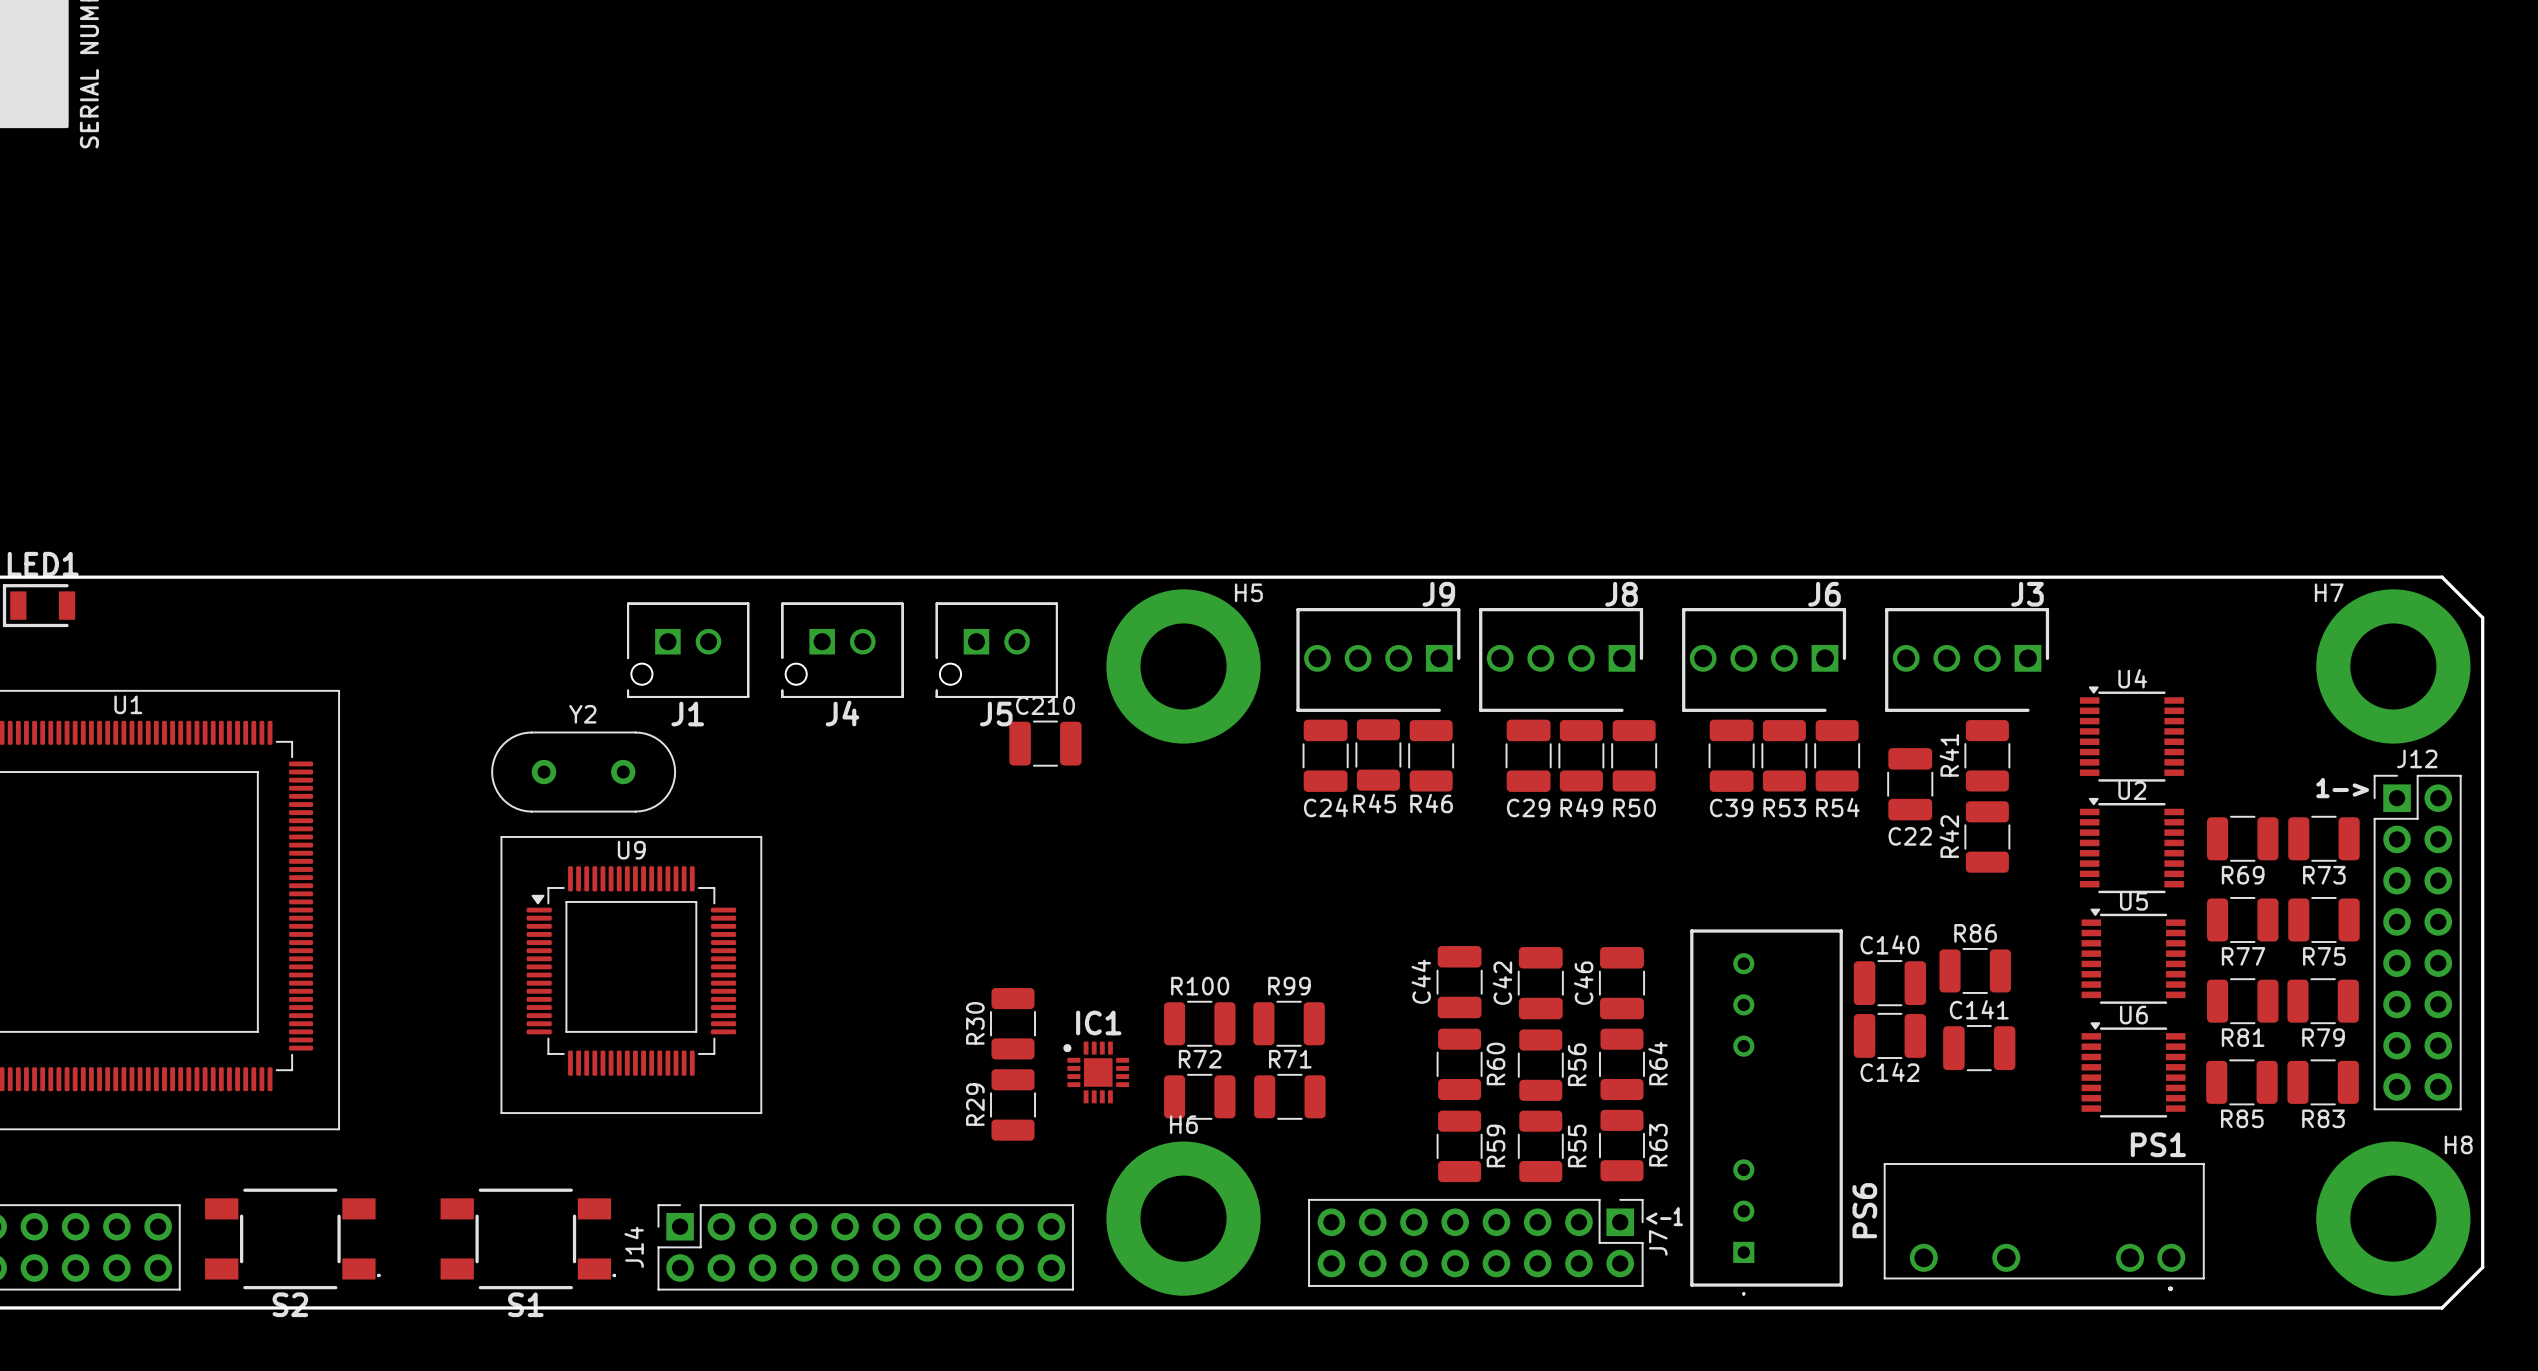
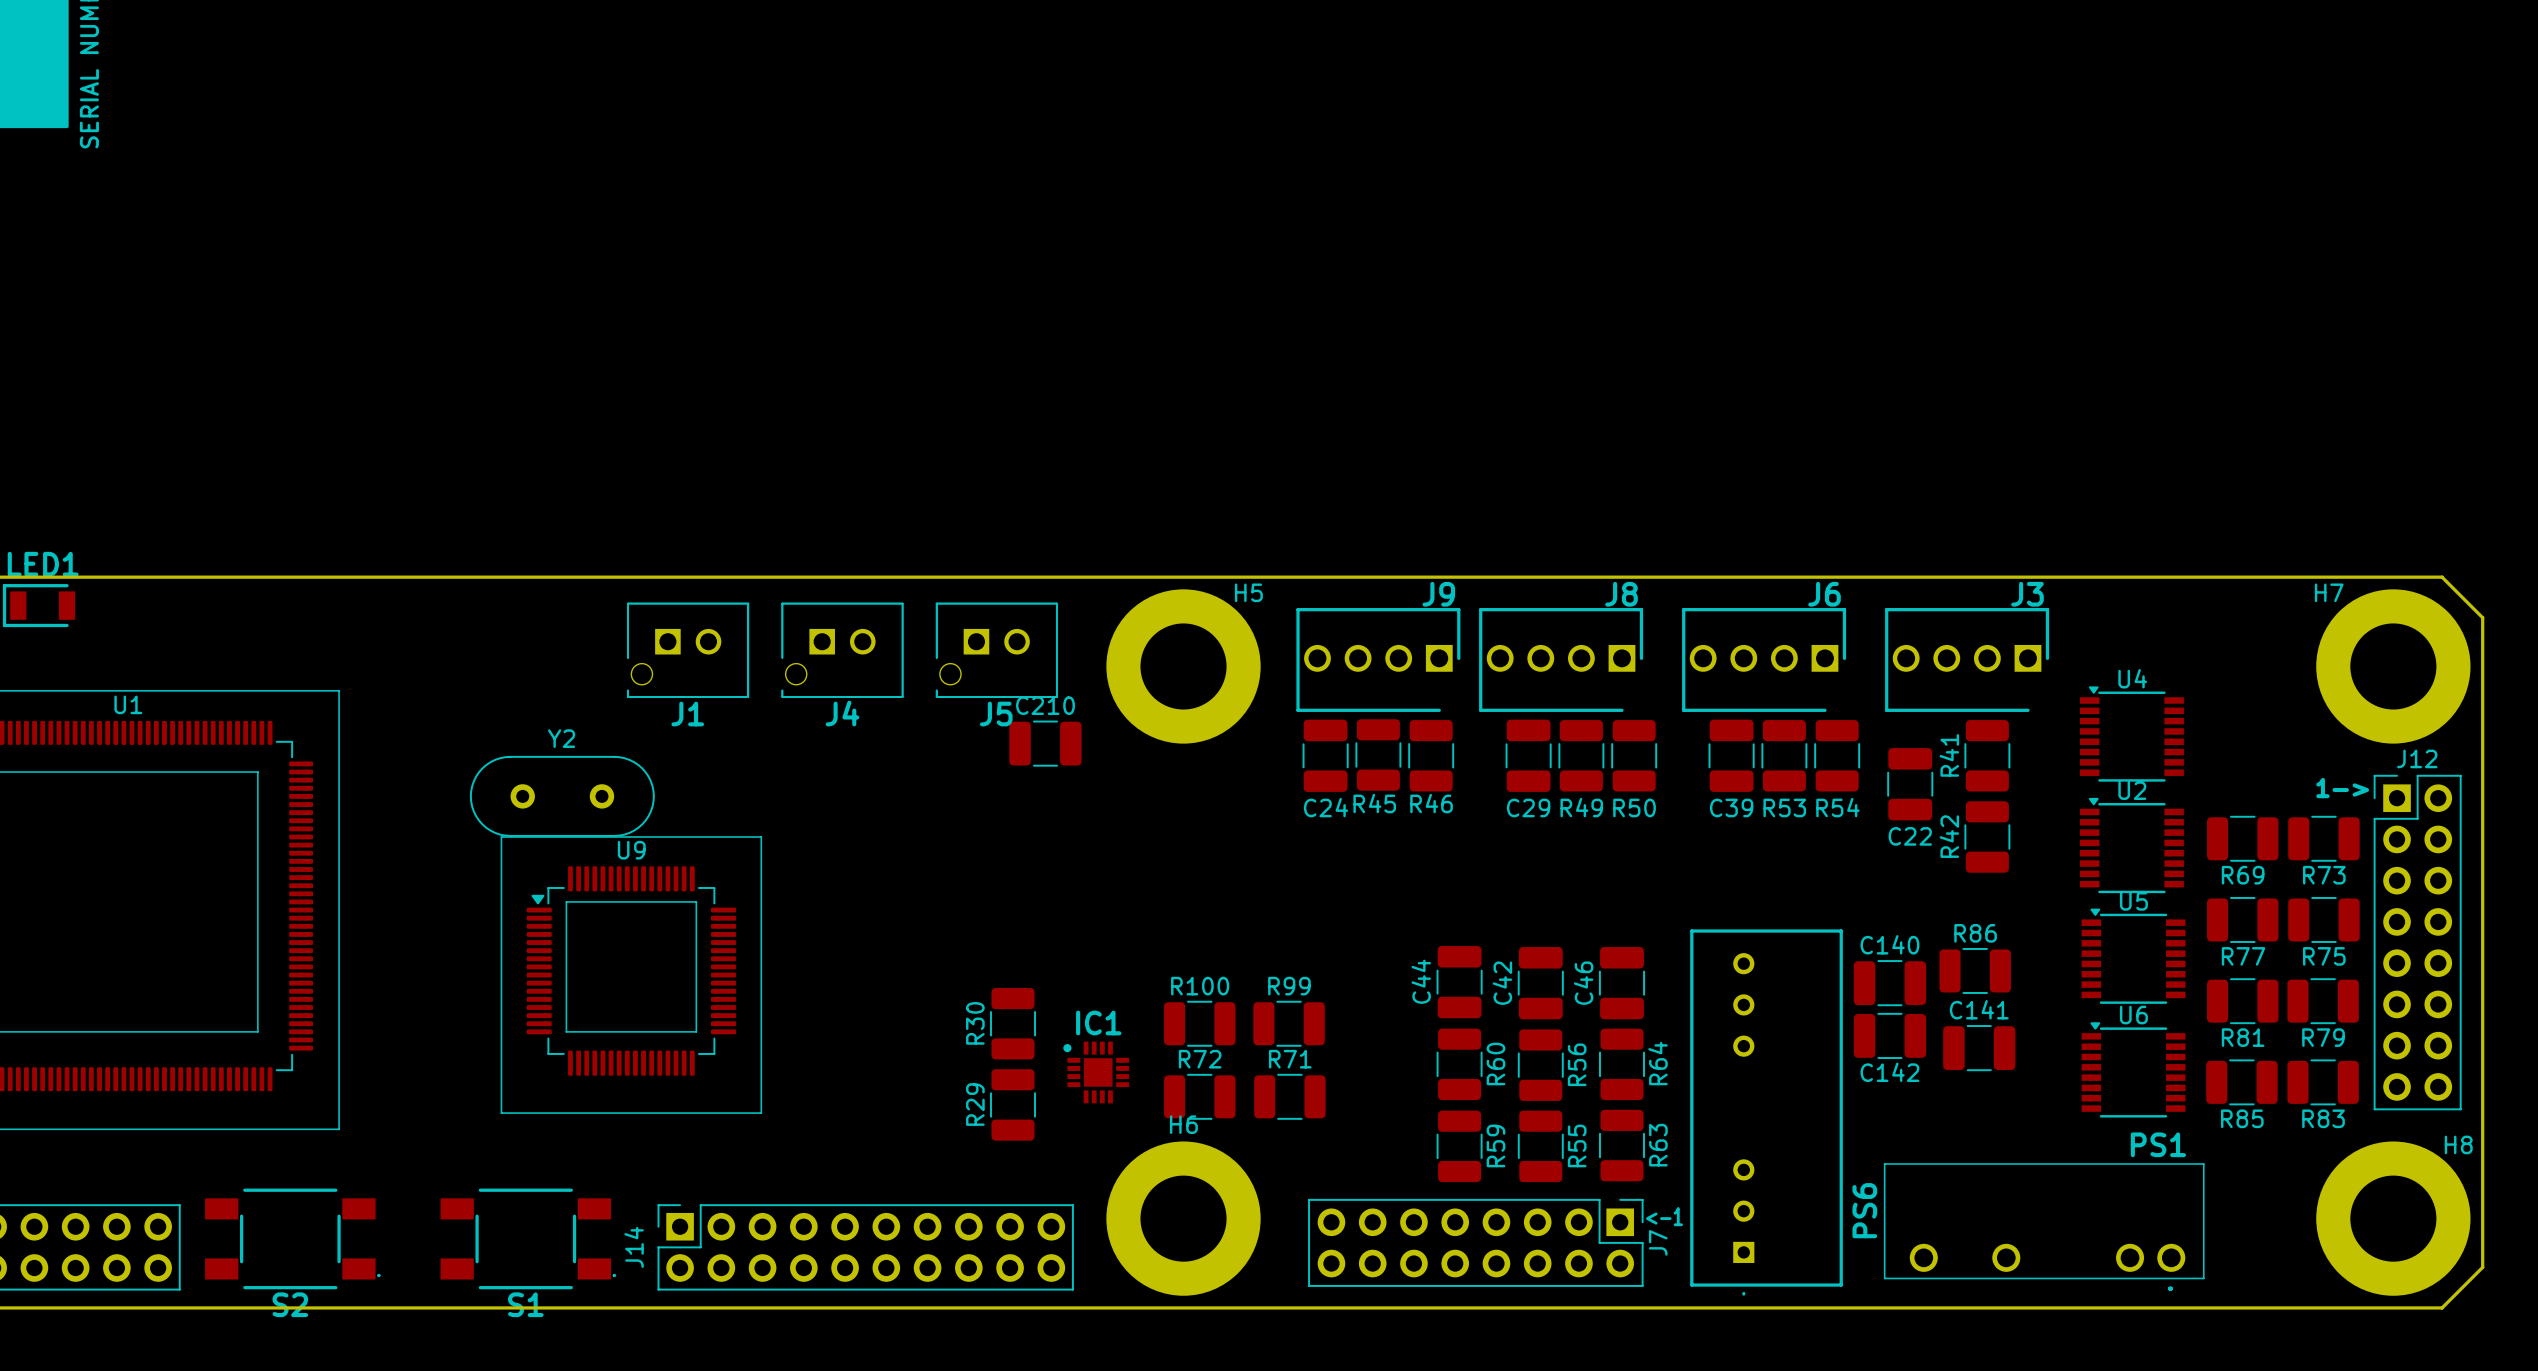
Y2 position: (583, 772) -> (562, 796)

